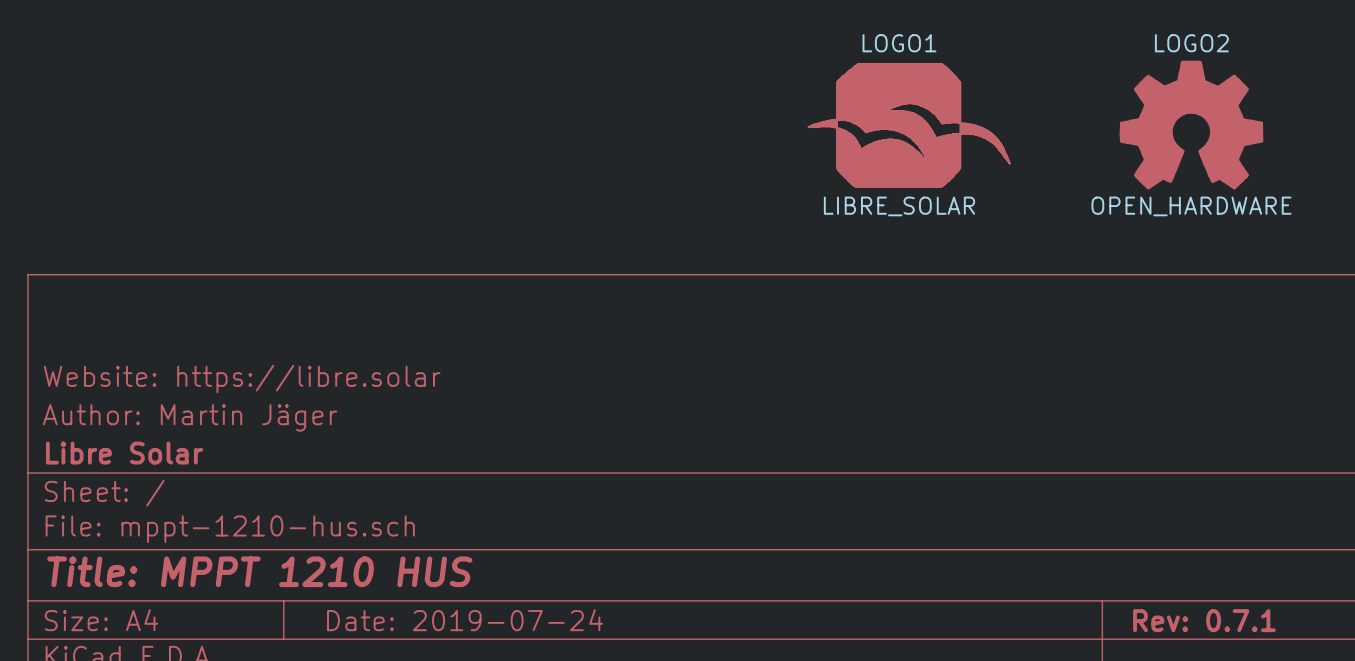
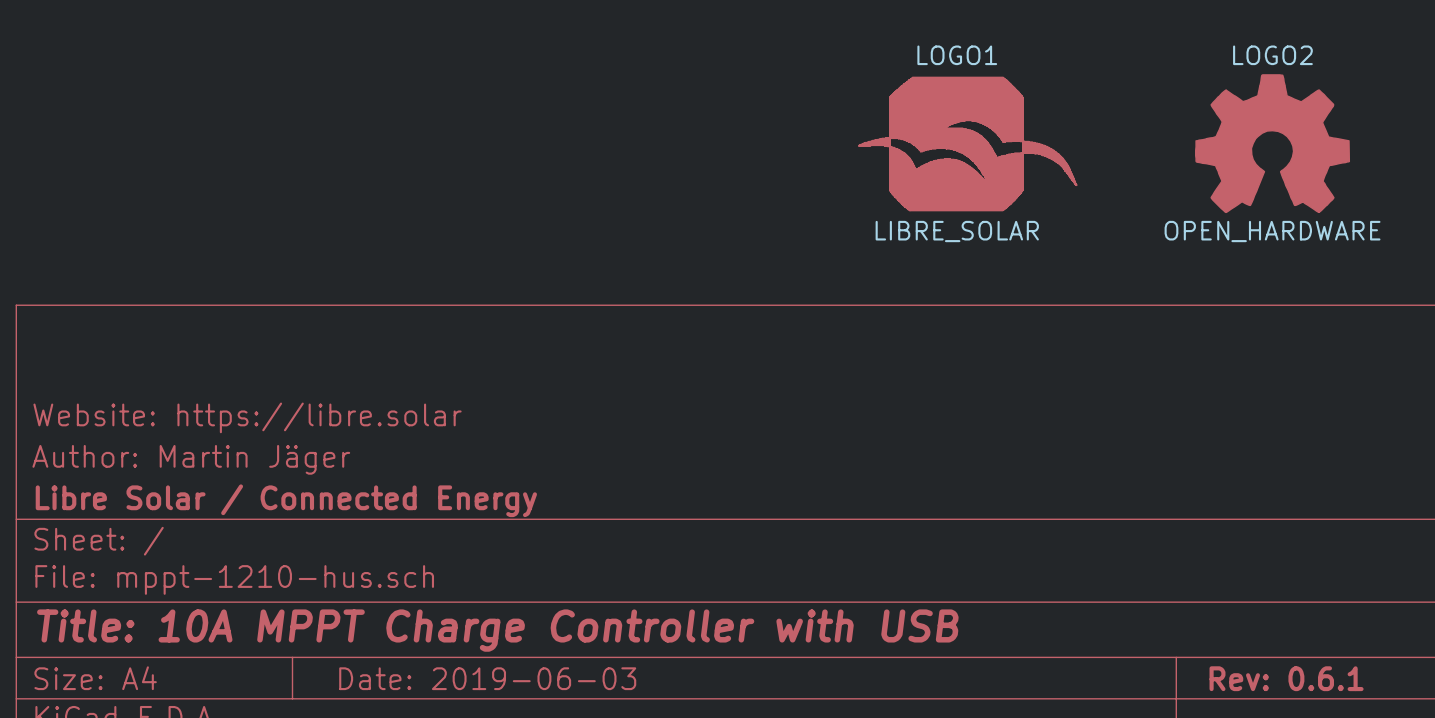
title block: Libre Solar (124, 453) -> Libre Solar / Connected Energy (286, 500)
title block: Title: MPPT 1210 HUS (259, 571) -> Title: 10A MPPT Charge Controller with USB (497, 630)
title block: Date: 2019-07-24 (465, 620) -> Date: 2019-06-03 (487, 678)
title block: Rev: 0.7.1 (1204, 620) -> Rev: 0.6.1 (1286, 678)

